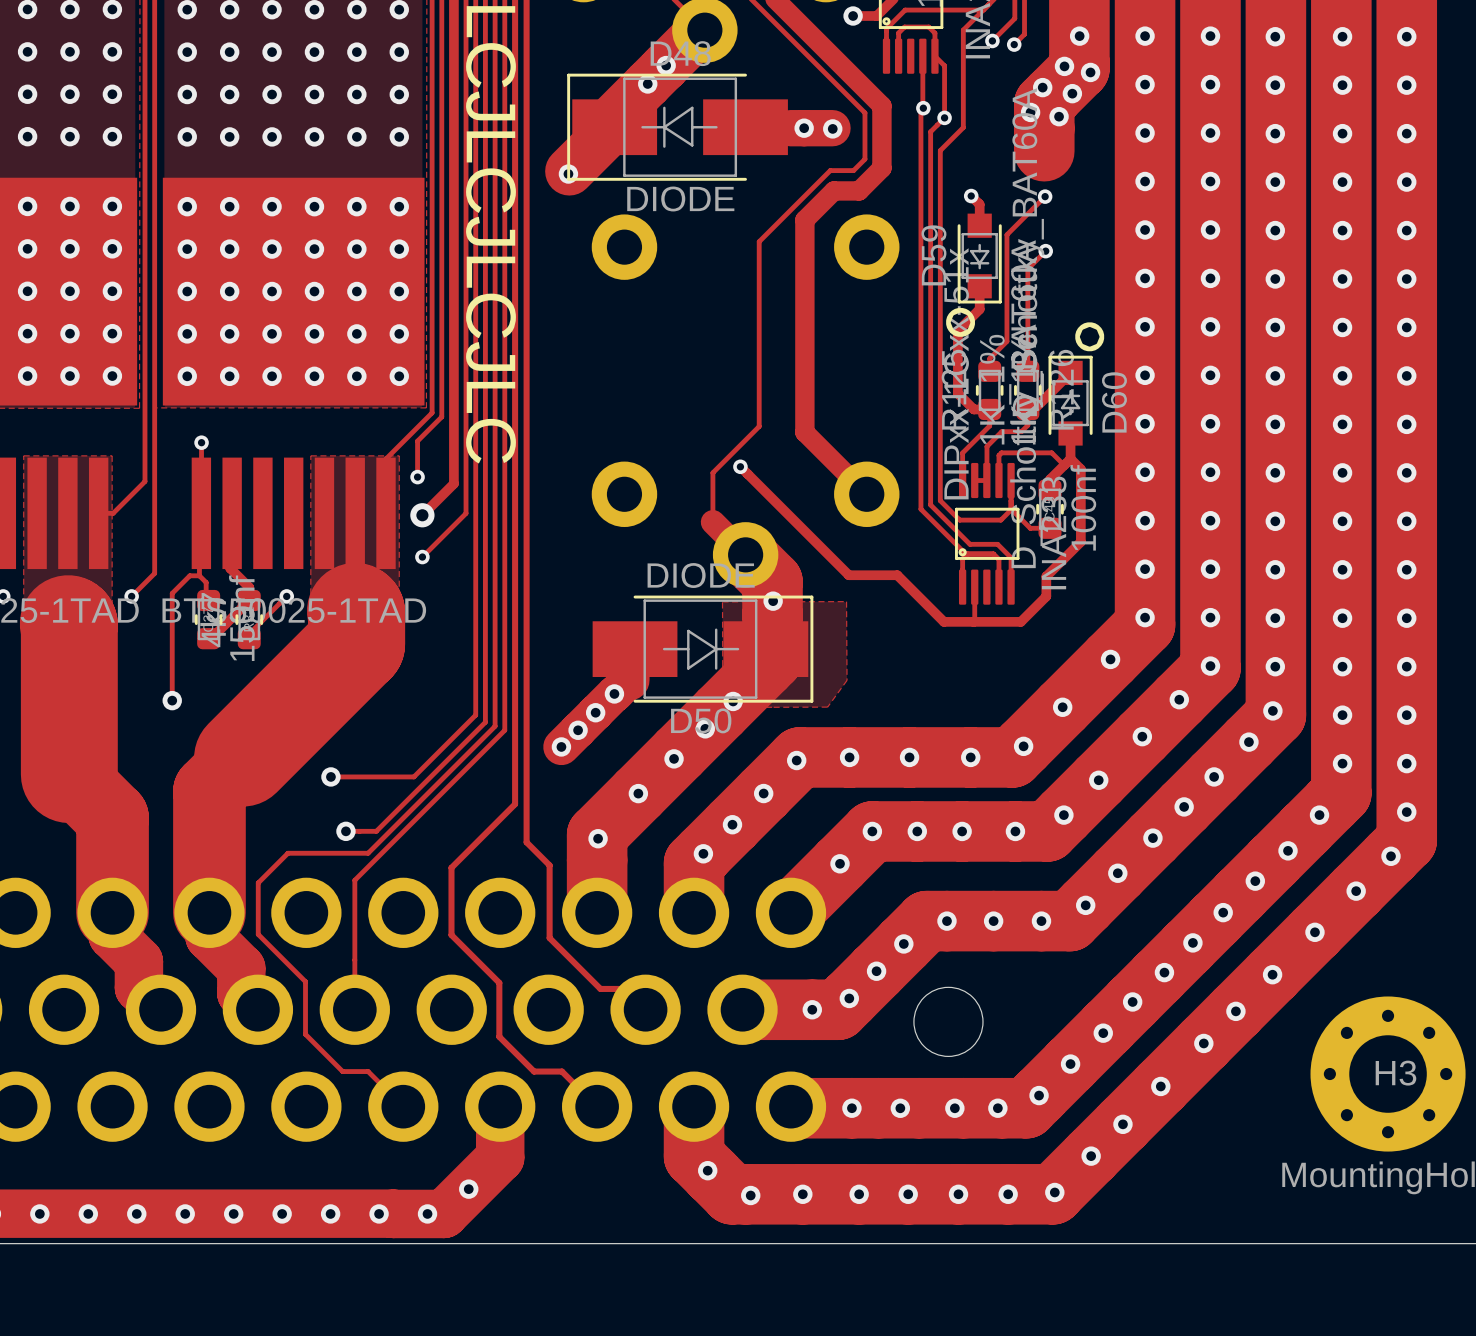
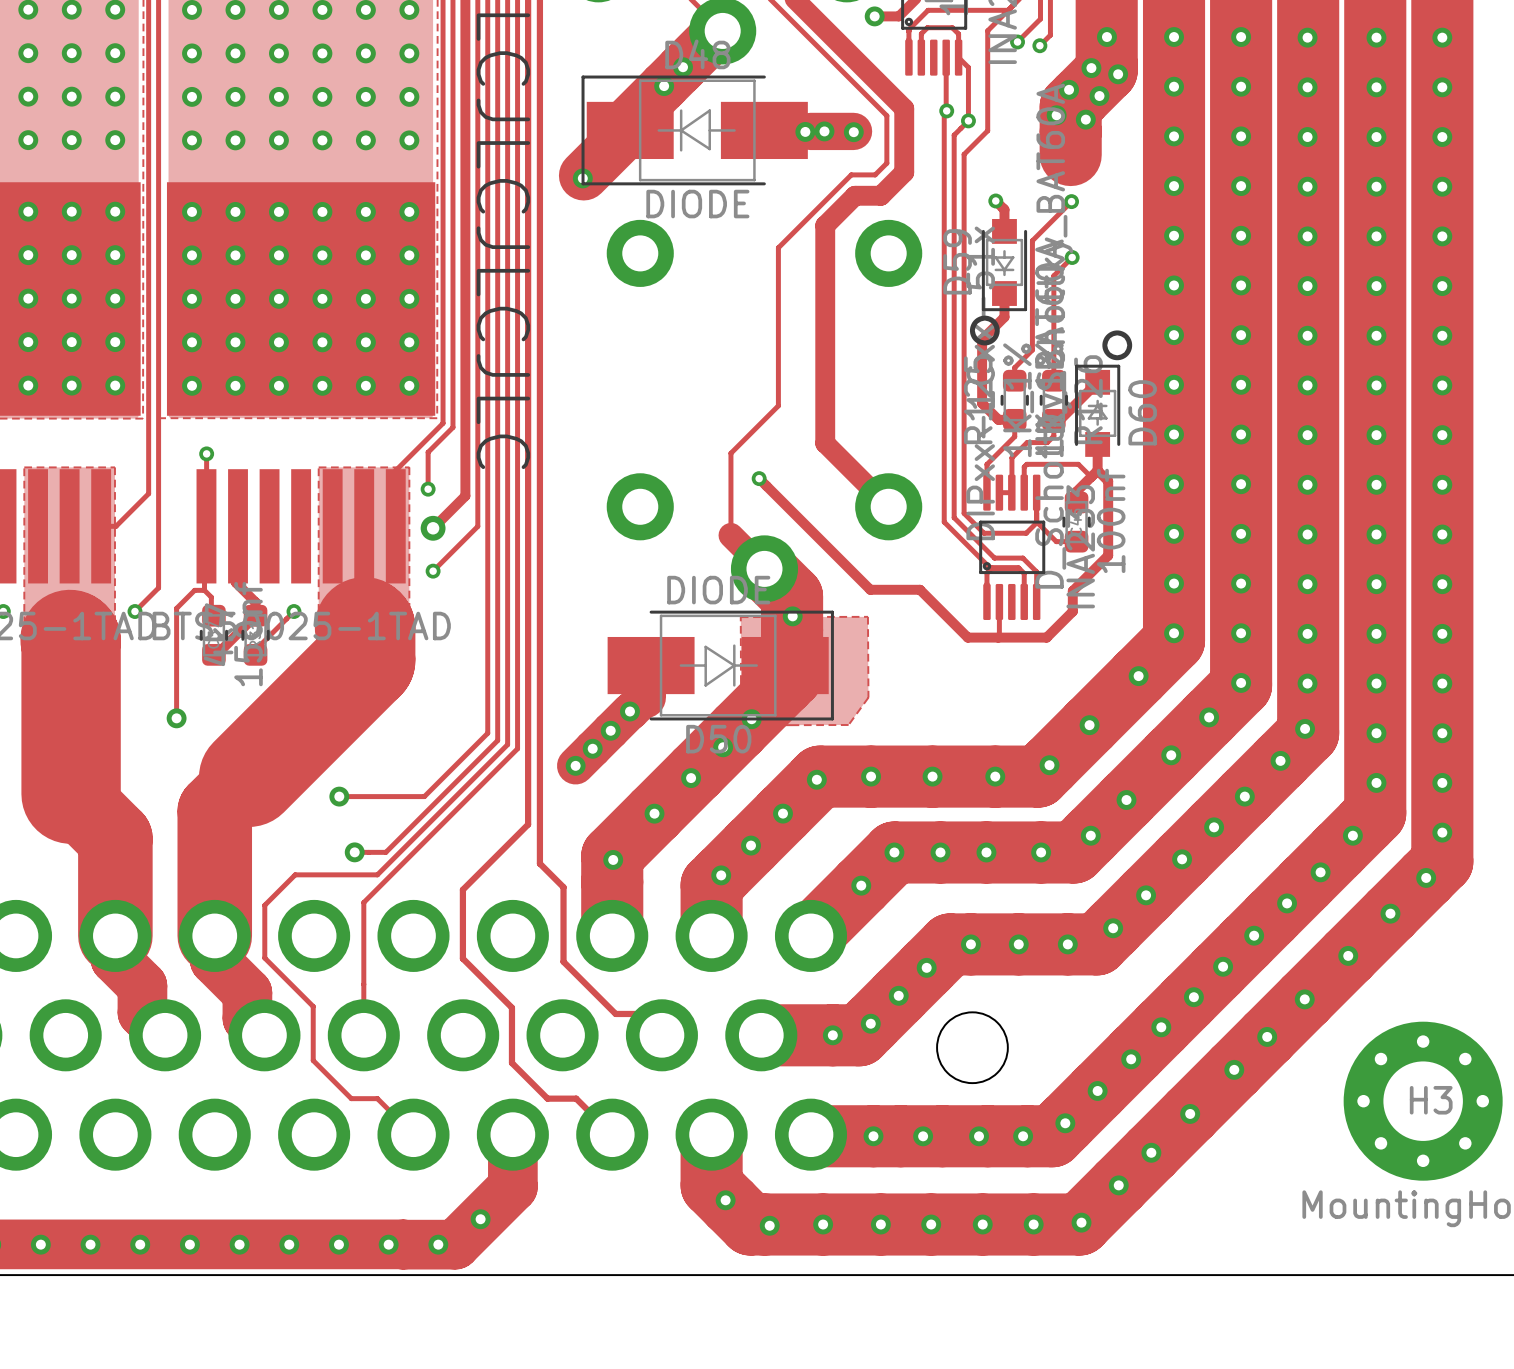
via: none -> (805, 131)
track: (759, 395) (759, 426) (712, 472) -> (778, 405) (730, 453) (730, 484)

